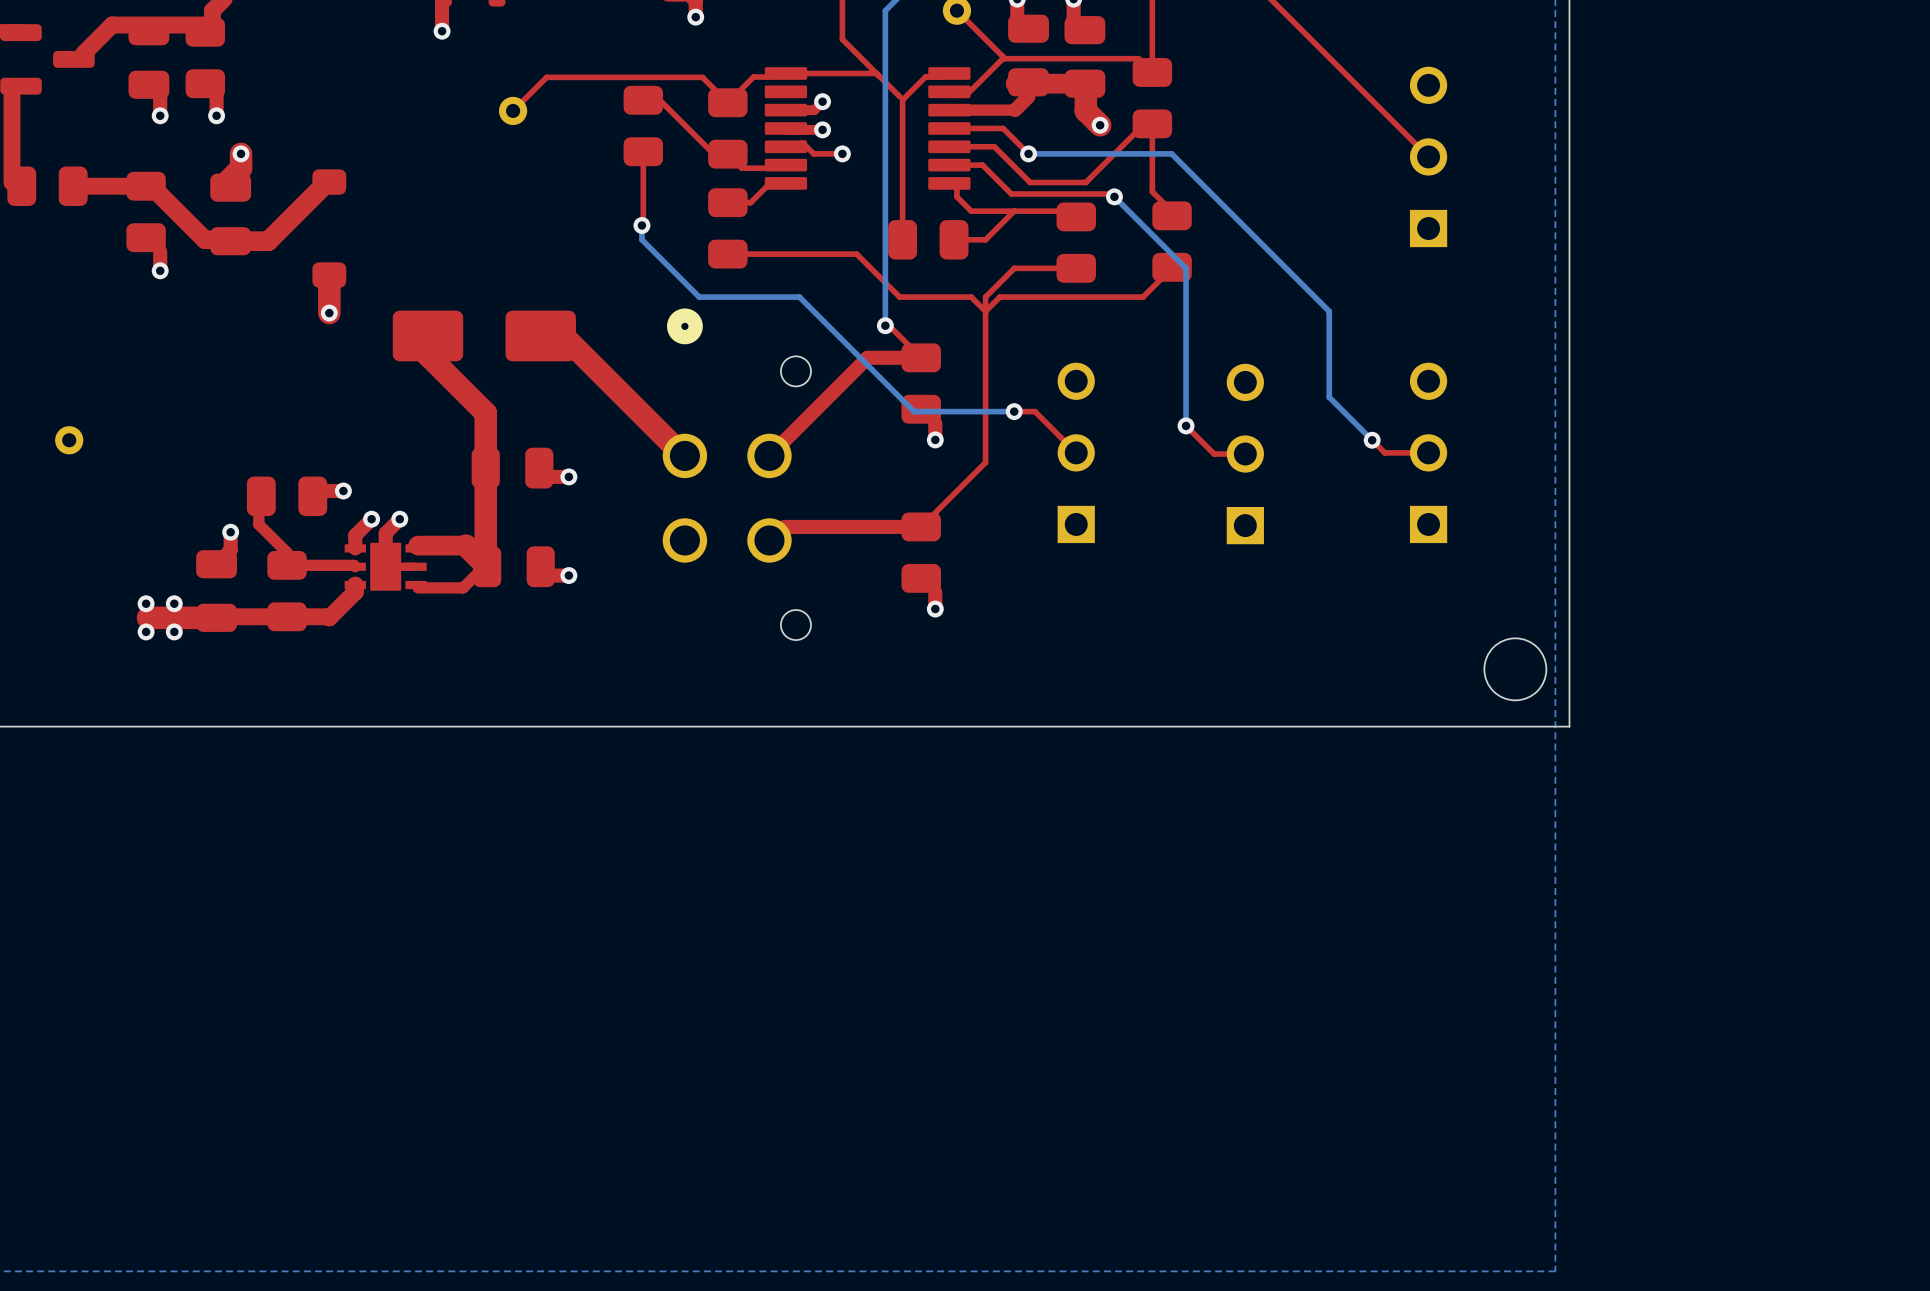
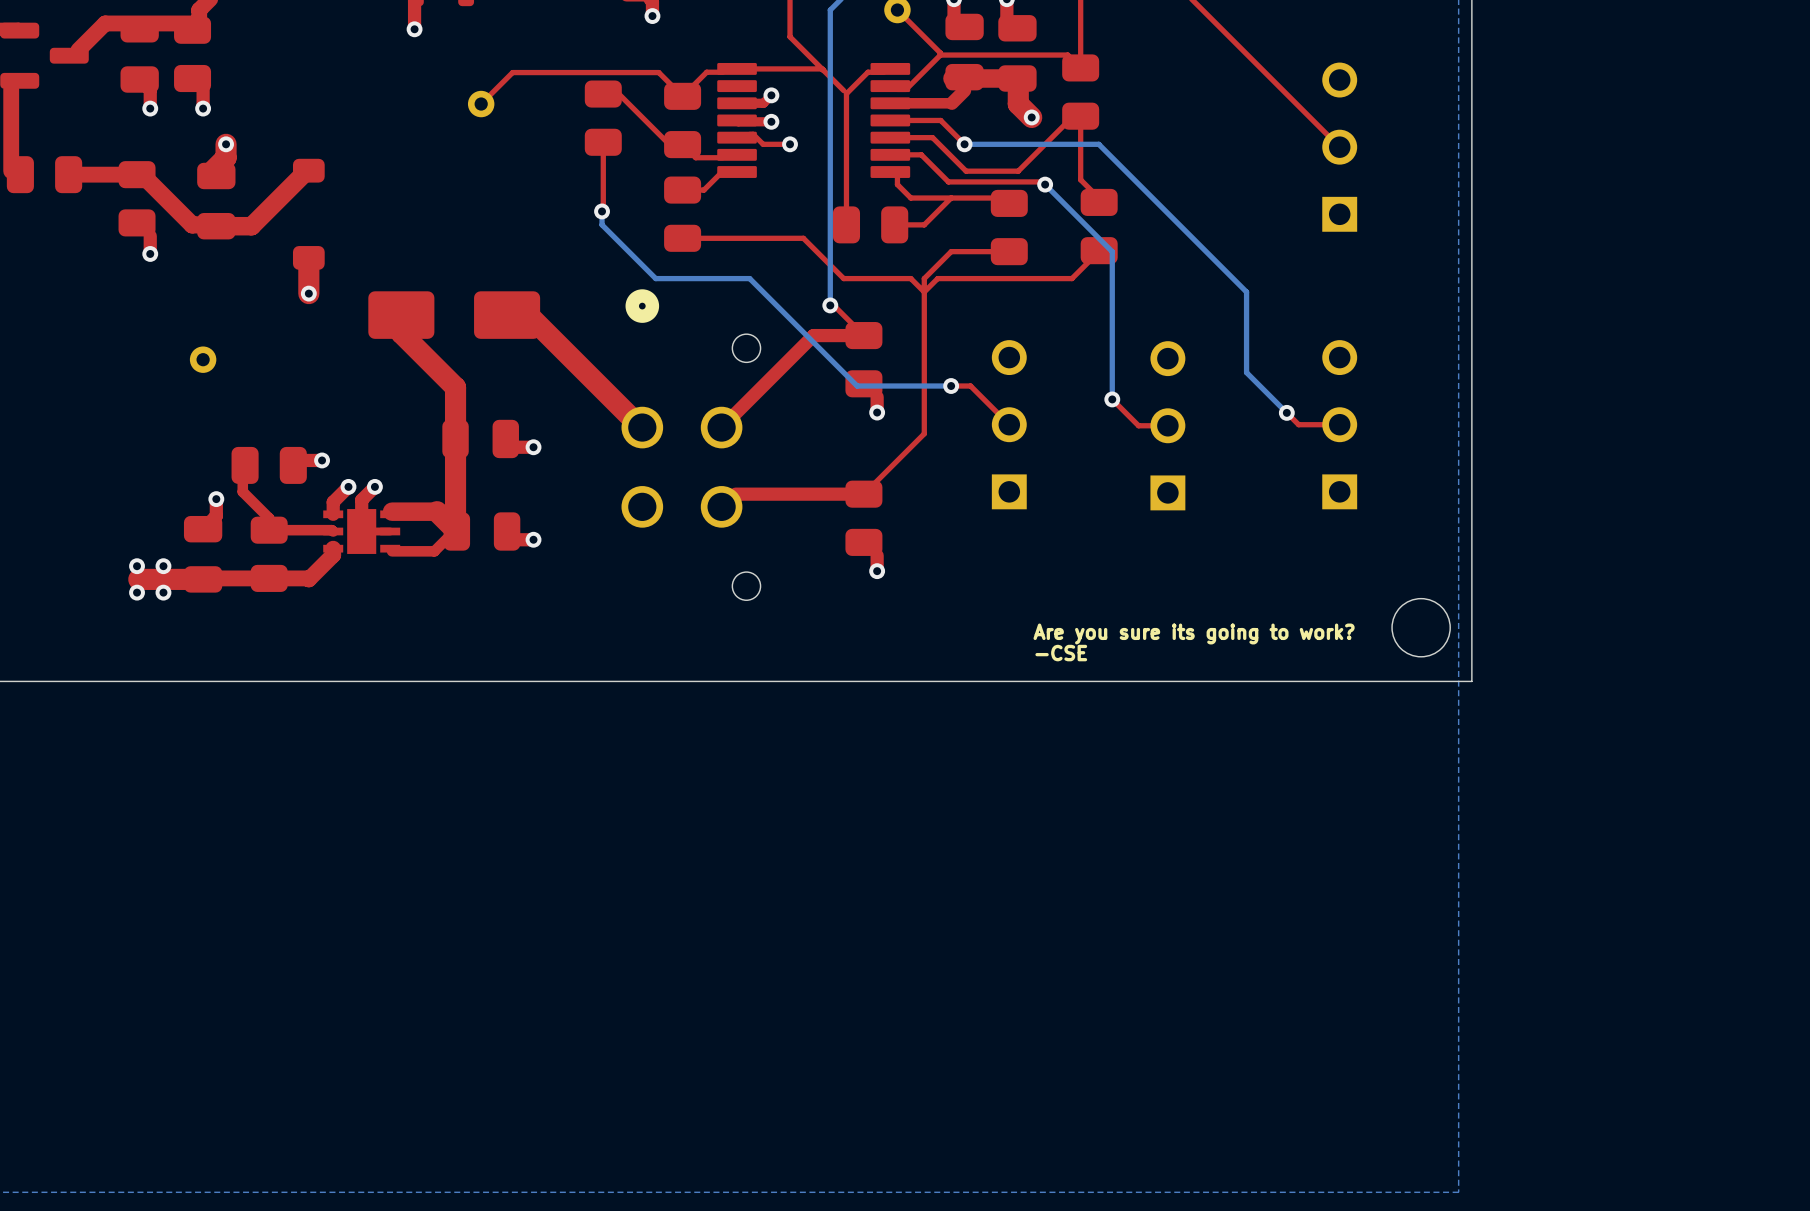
part position: (69, 440) -> (203, 359)
text: none -> Are you sure its going to work? (1194, 633)
text: none -> -CSE (1061, 653)

